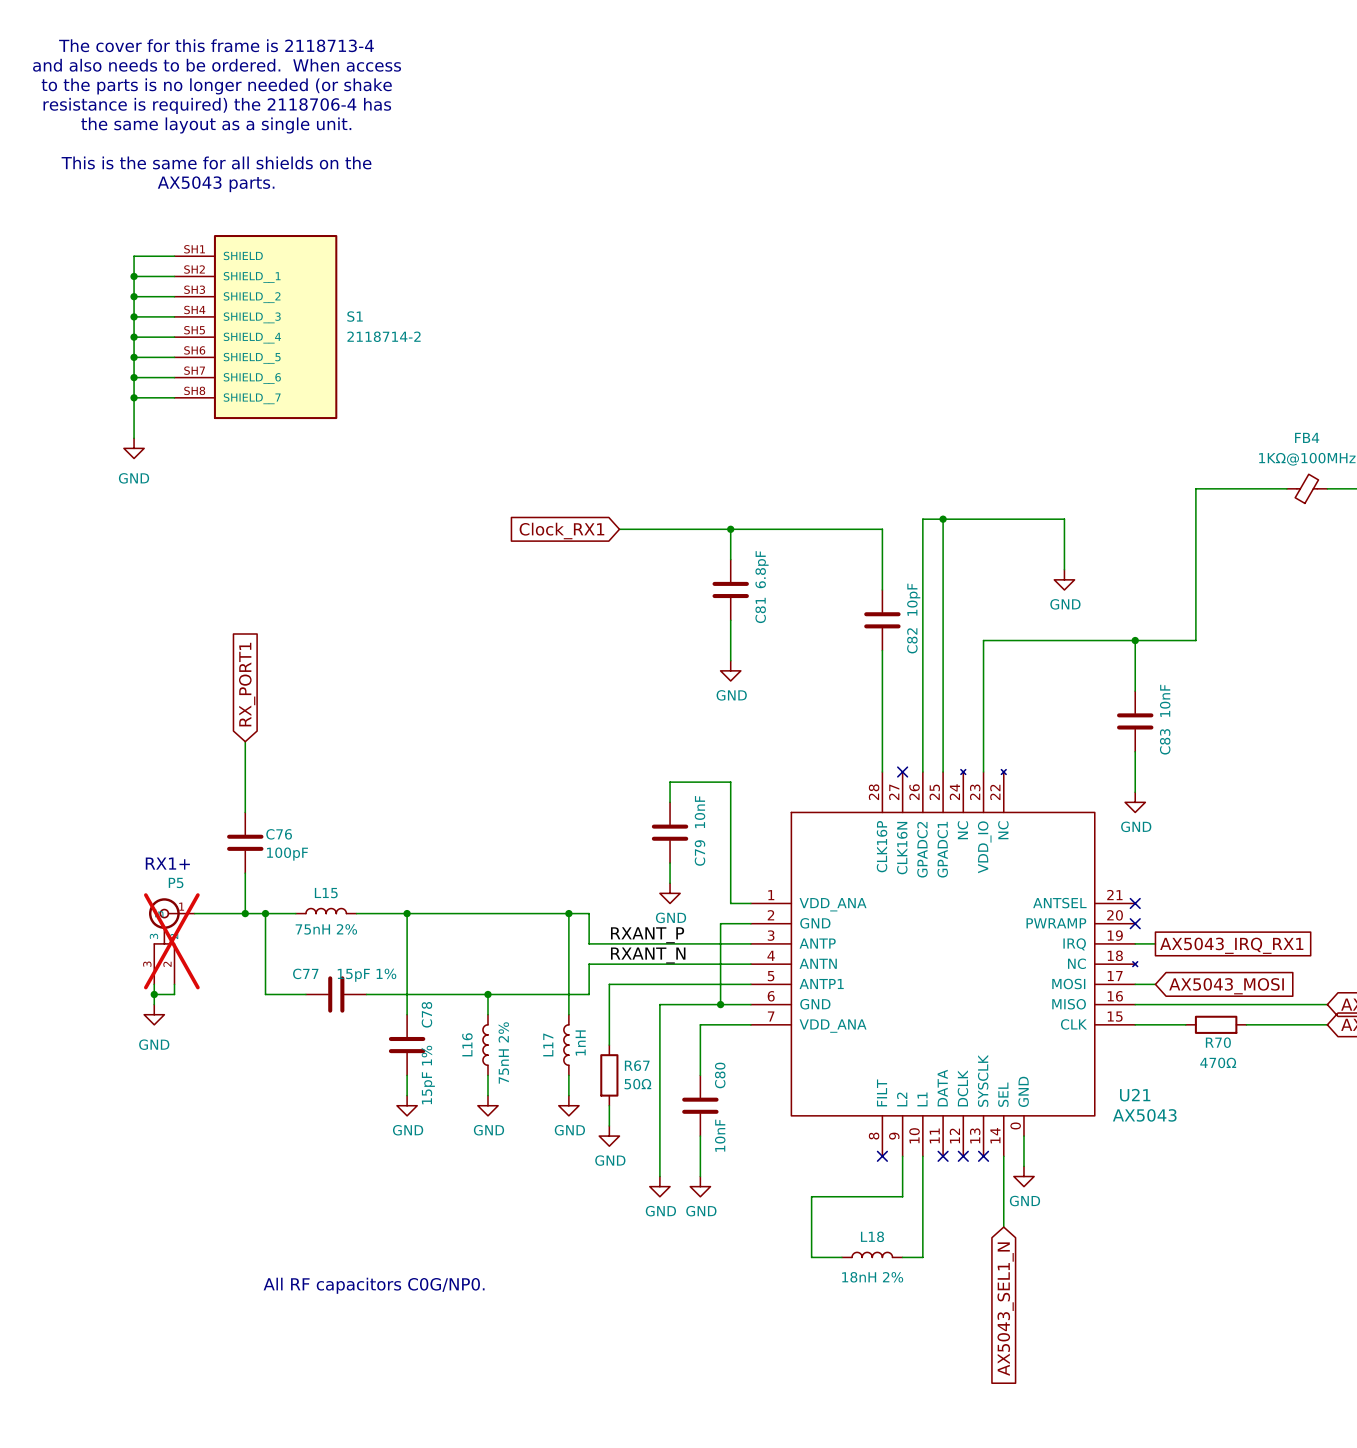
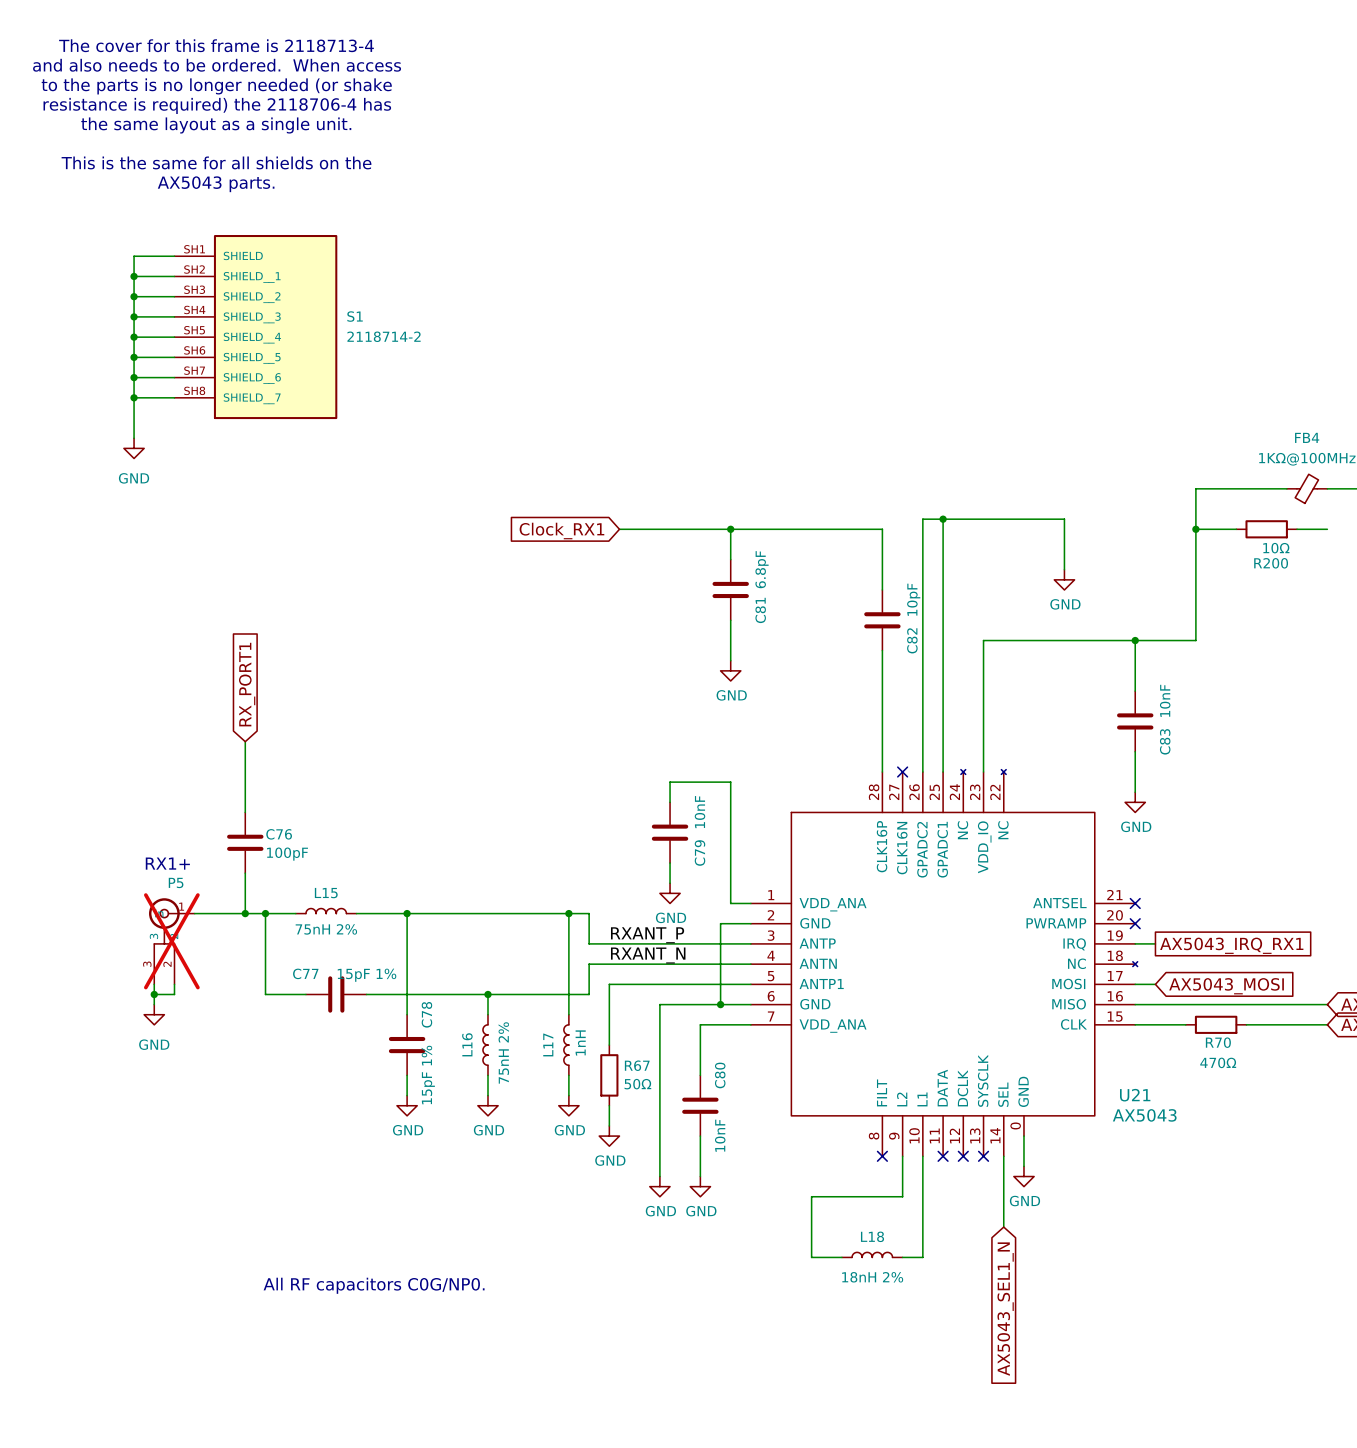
wire: none -> (1195, 529) (1236, 529)
junction: none -> (1195, 529)
R200: none -> 10Ω (1266, 529)
wire: none -> (1297, 529) (1327, 529)

